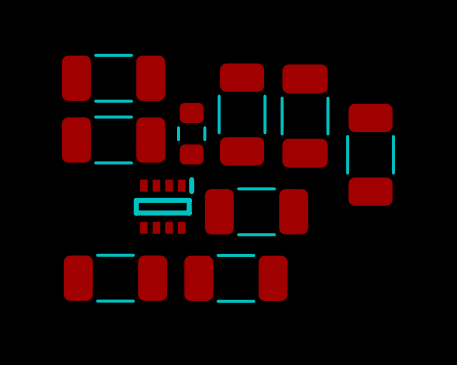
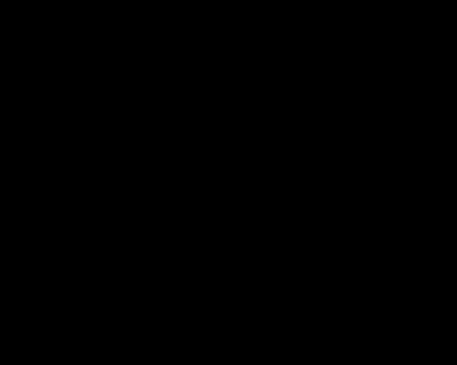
part: (113, 78) -> none
part: (242, 114) -> none
part: (305, 116) -> none
part: (191, 133) -> none
part: (113, 139) -> none
part: (370, 154) -> none
part: (163, 205) -> none
part: (256, 211) -> none
part: (115, 278) -> none
part: (235, 278) -> none

